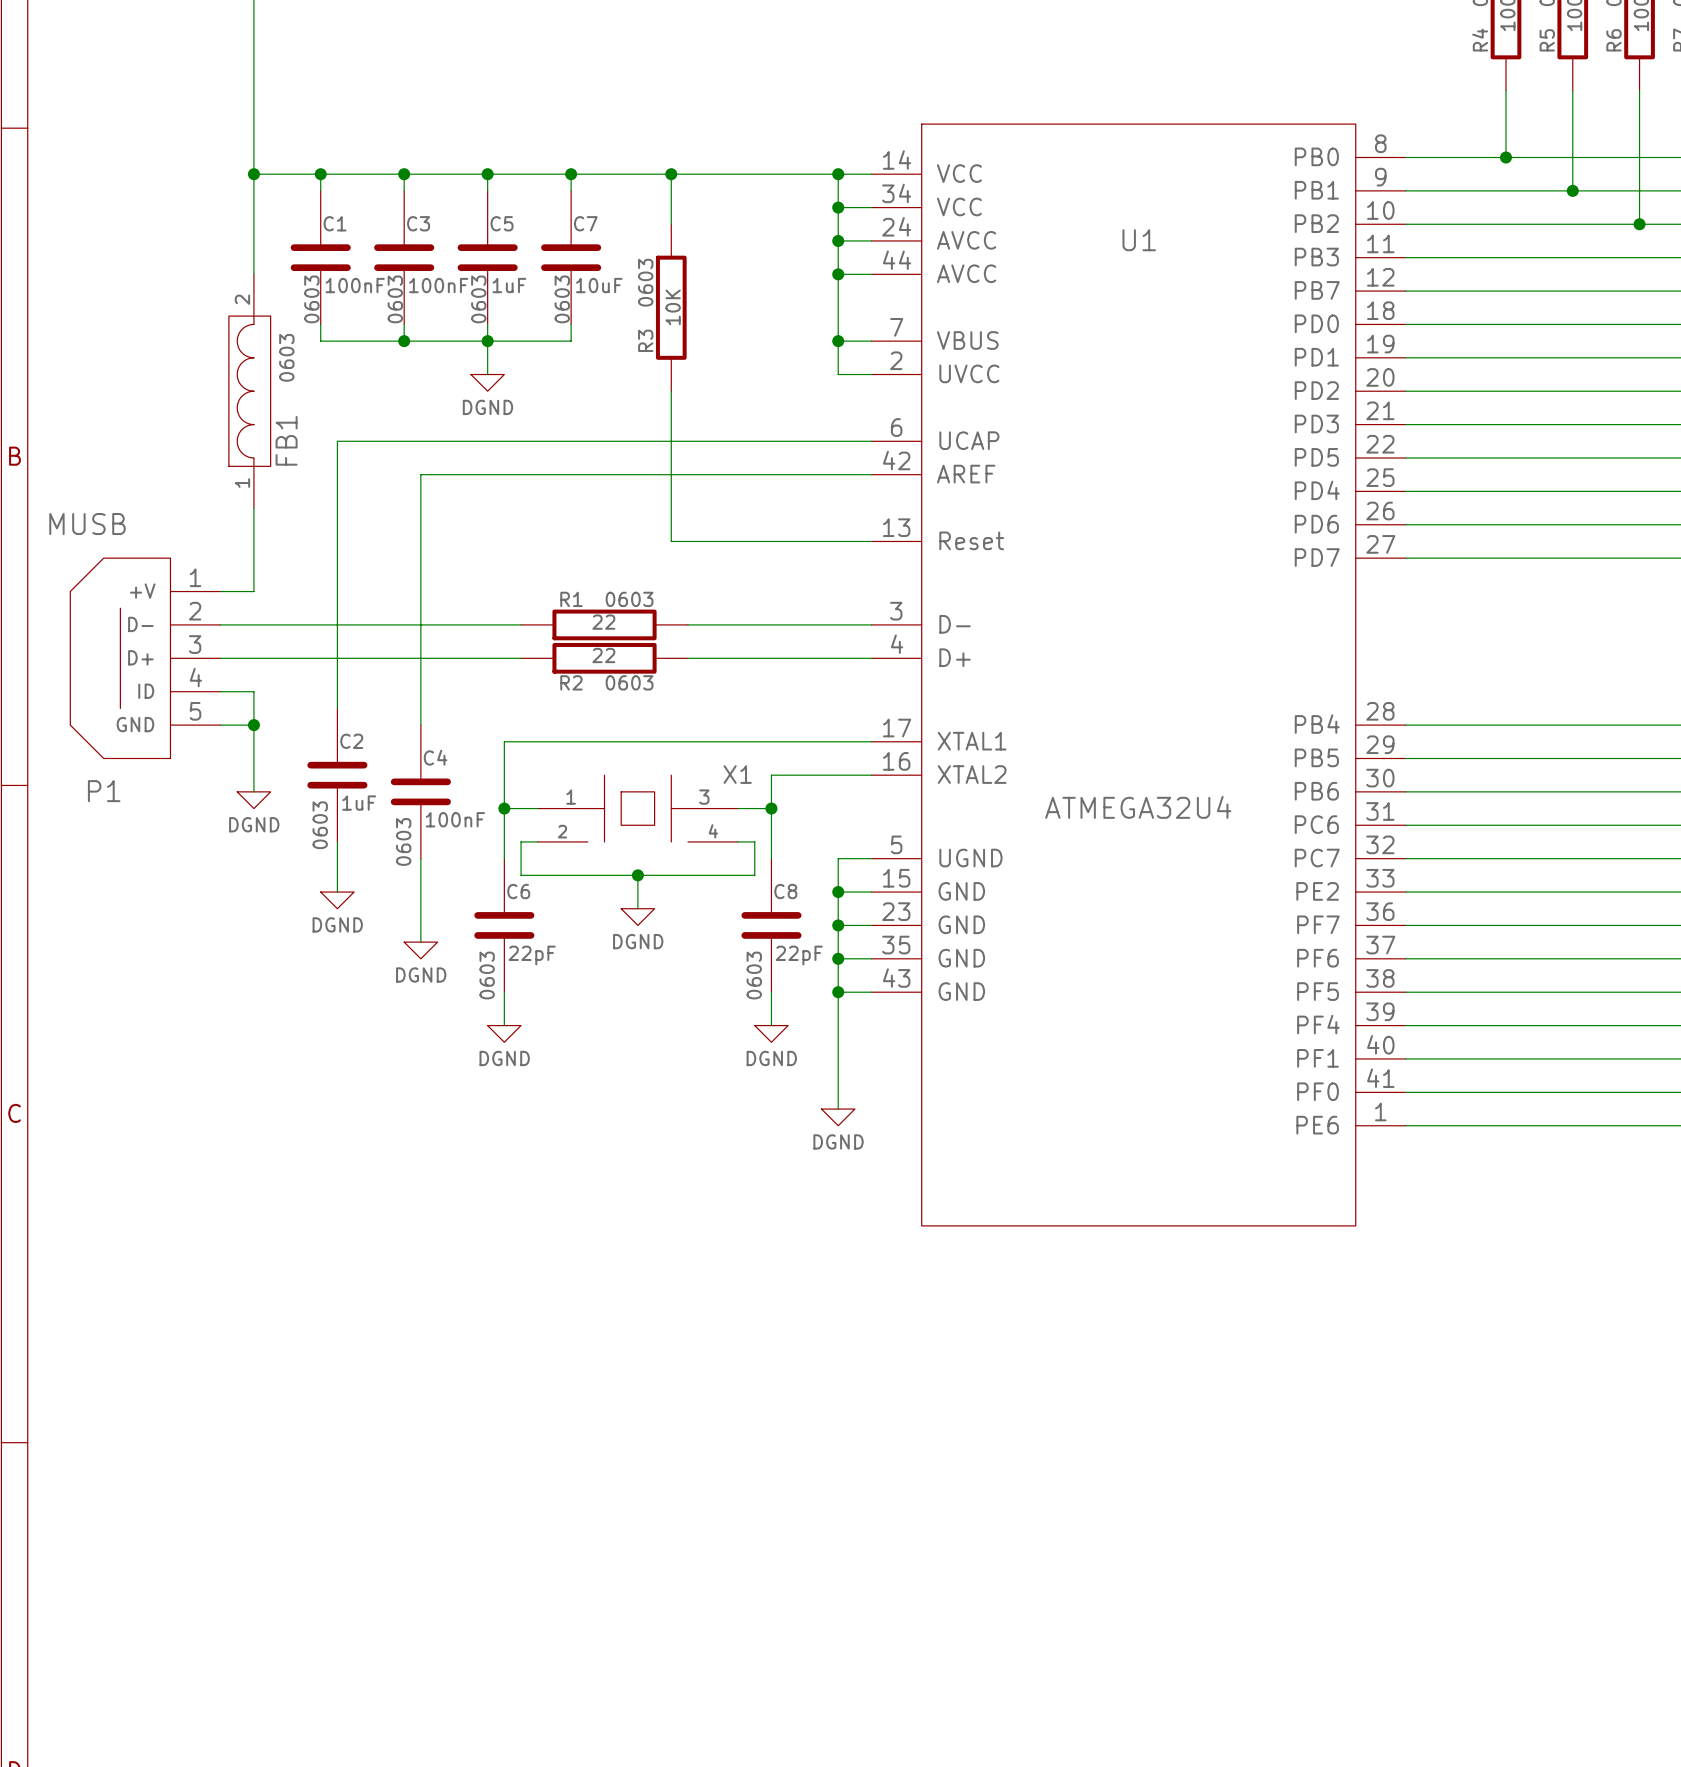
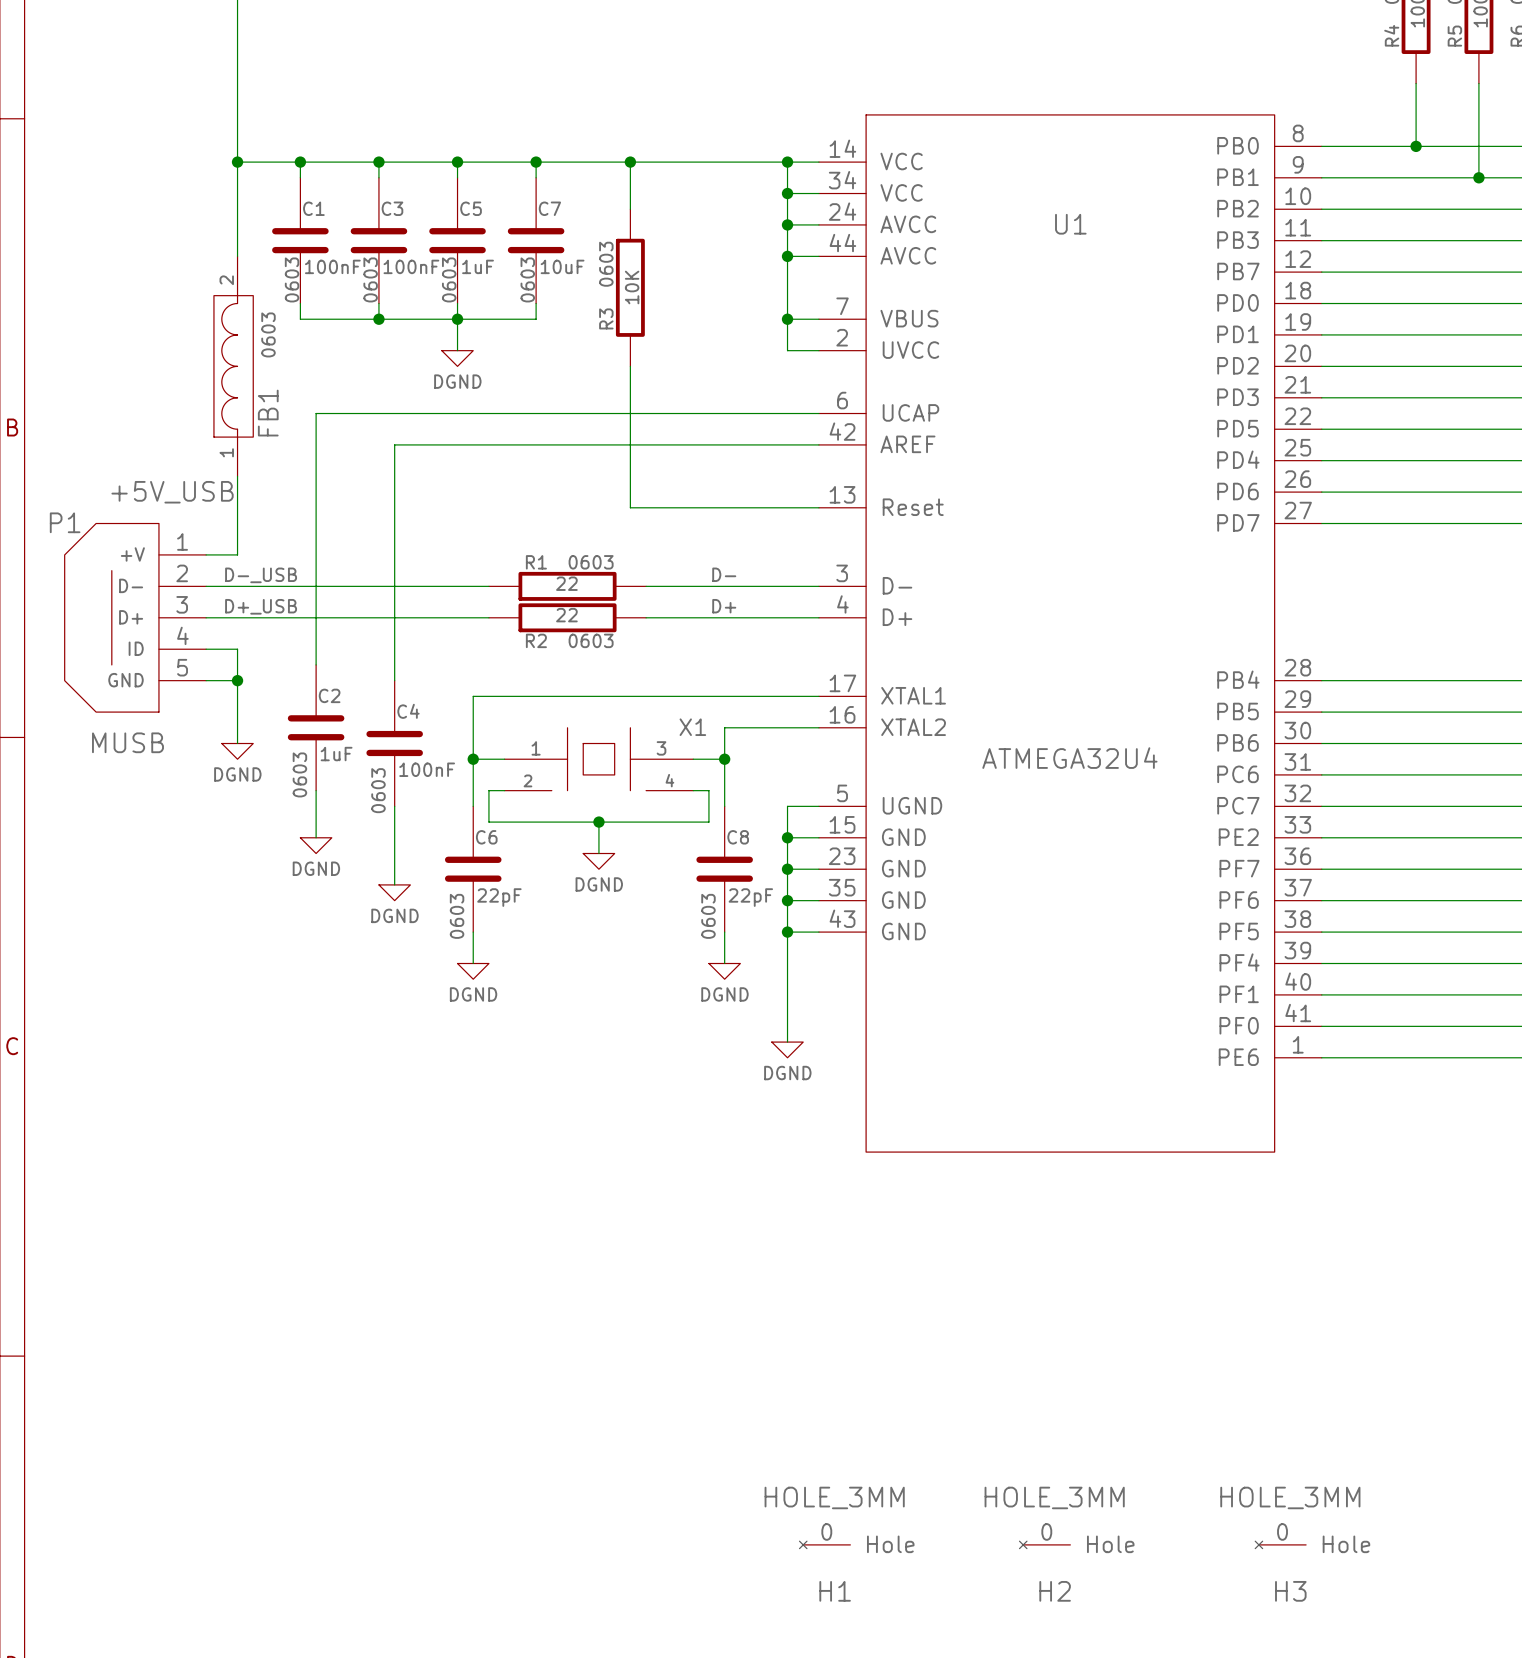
P1 value position: MUSB (87, 524) -> MUSB (127, 742)
label: none -> +5V_USB (172, 492)
label: none -> D- (724, 574)
label: none -> D-_USB (261, 575)
label: none -> D+_USB (261, 606)
label: none -> D+ (724, 606)
P1 name position: P1 (104, 791) -> P1 (65, 522)
H1: none -> HOLE_3MM (824, 1544)
H2: none -> HOLE_3MM (1044, 1544)
H3: none -> HOLE_3MM (1280, 1544)

